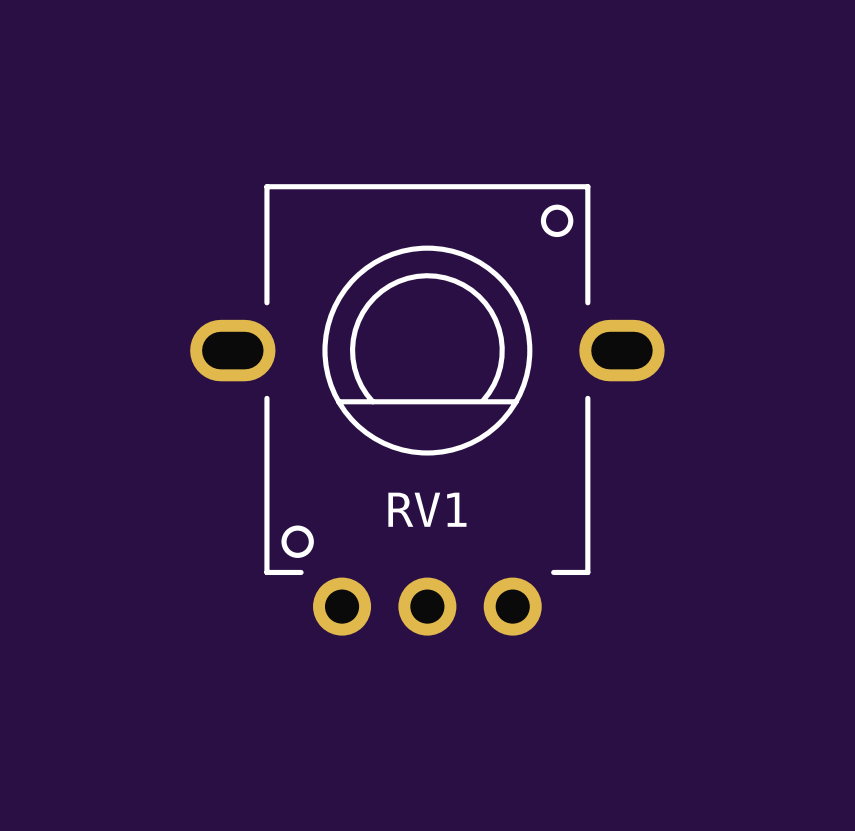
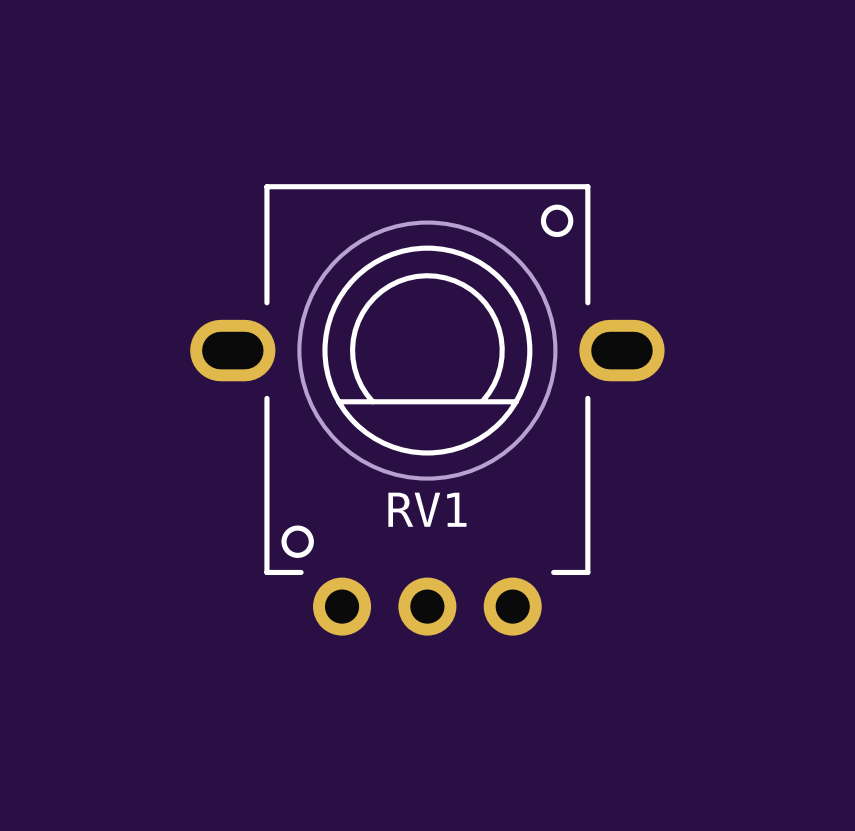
drawing: none -> [297, 220, 558, 481]

